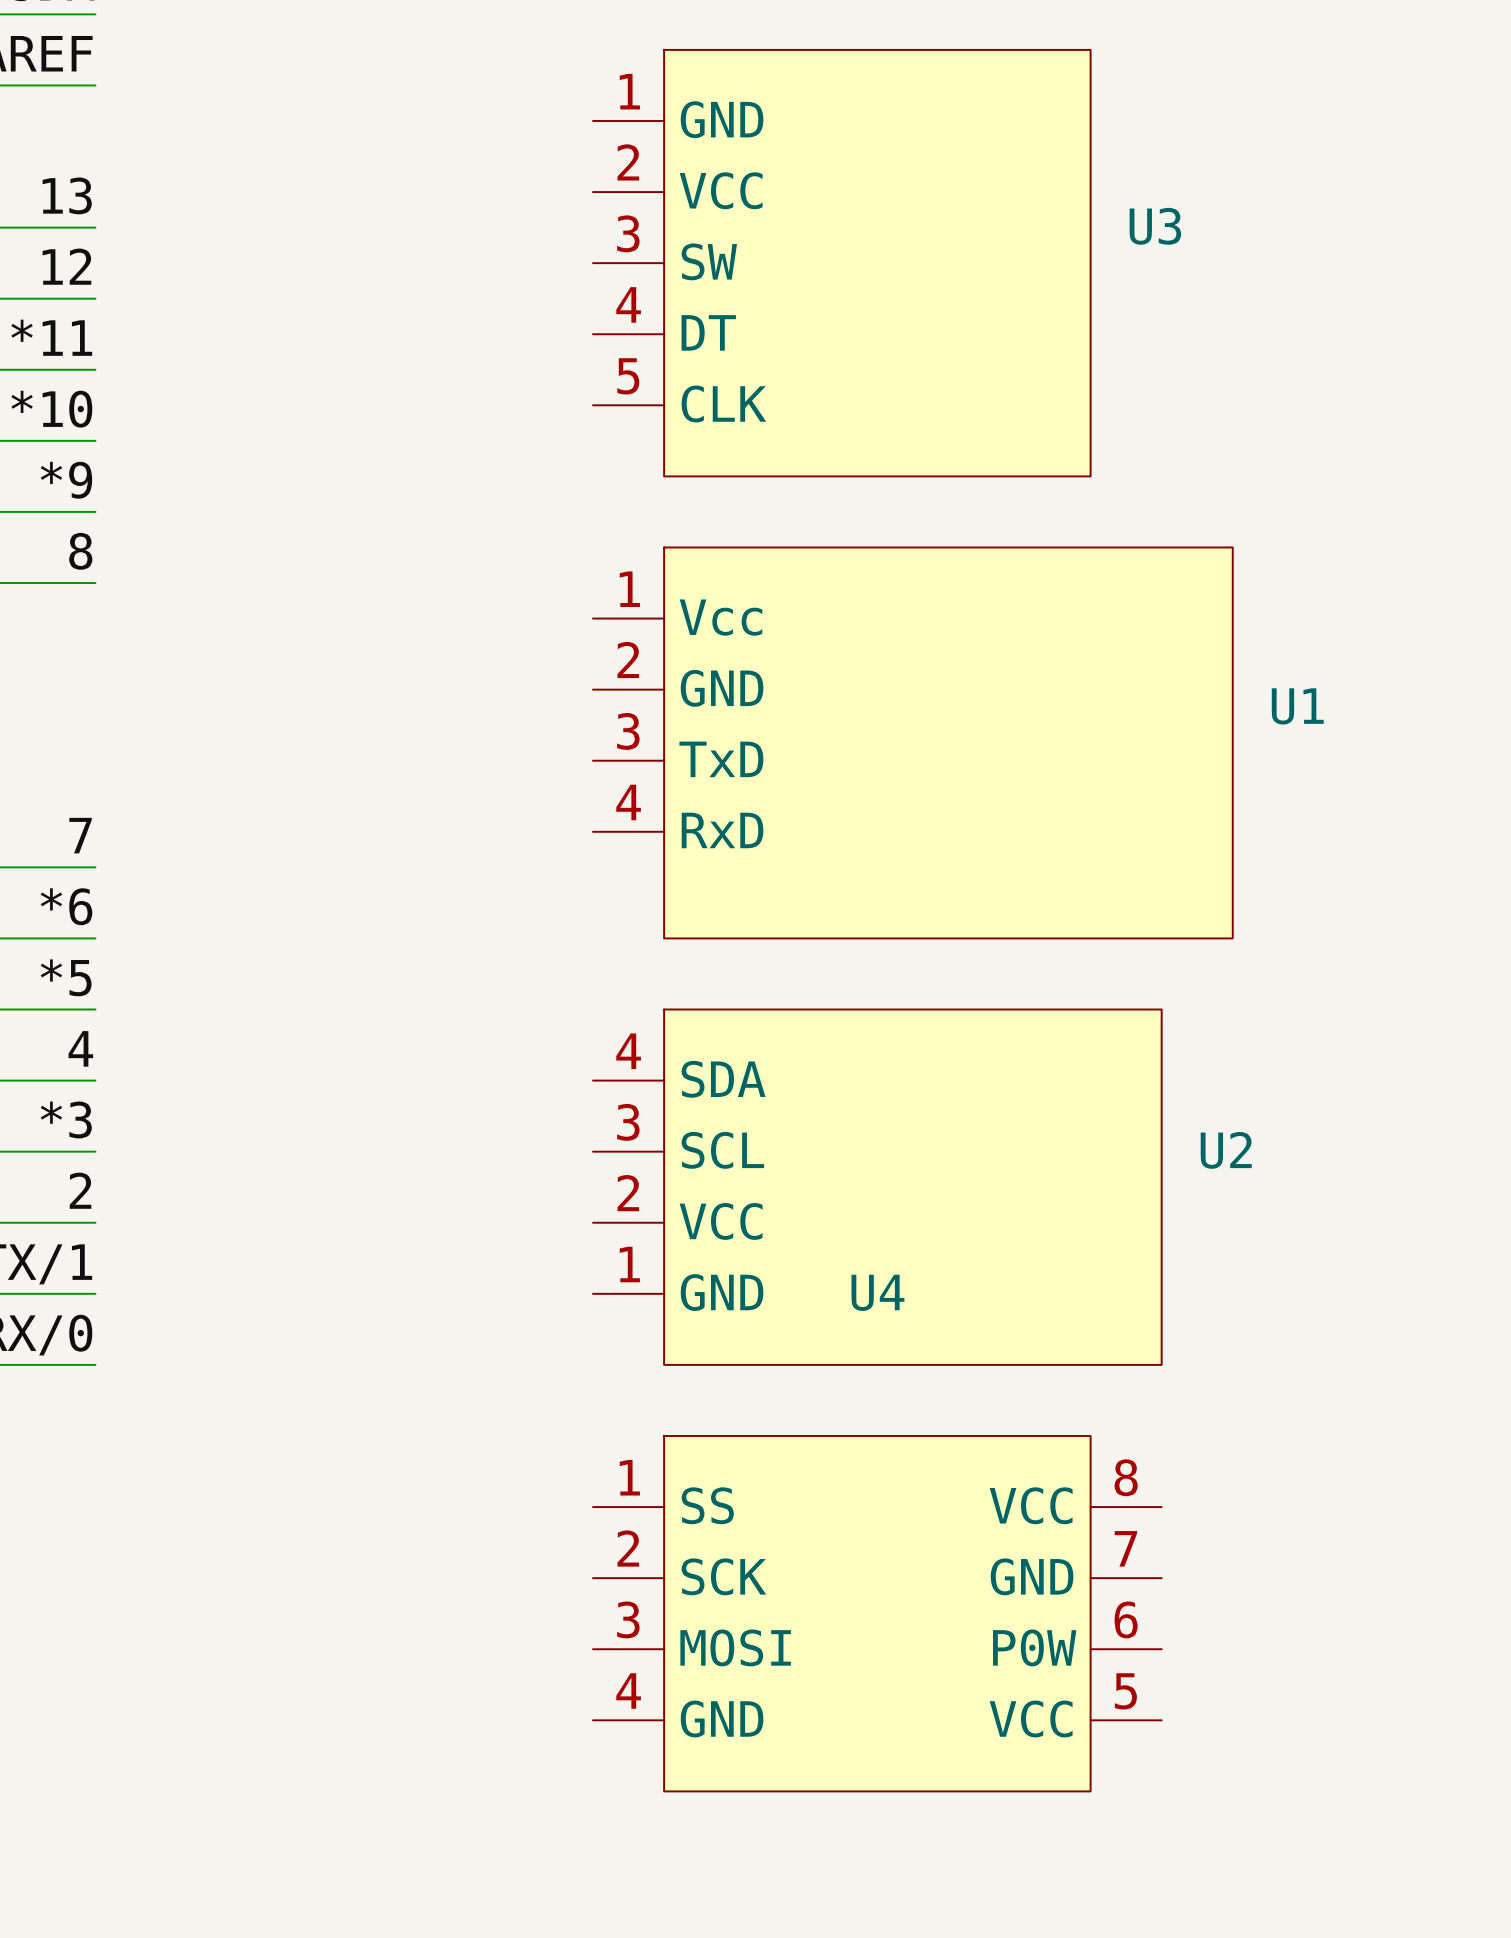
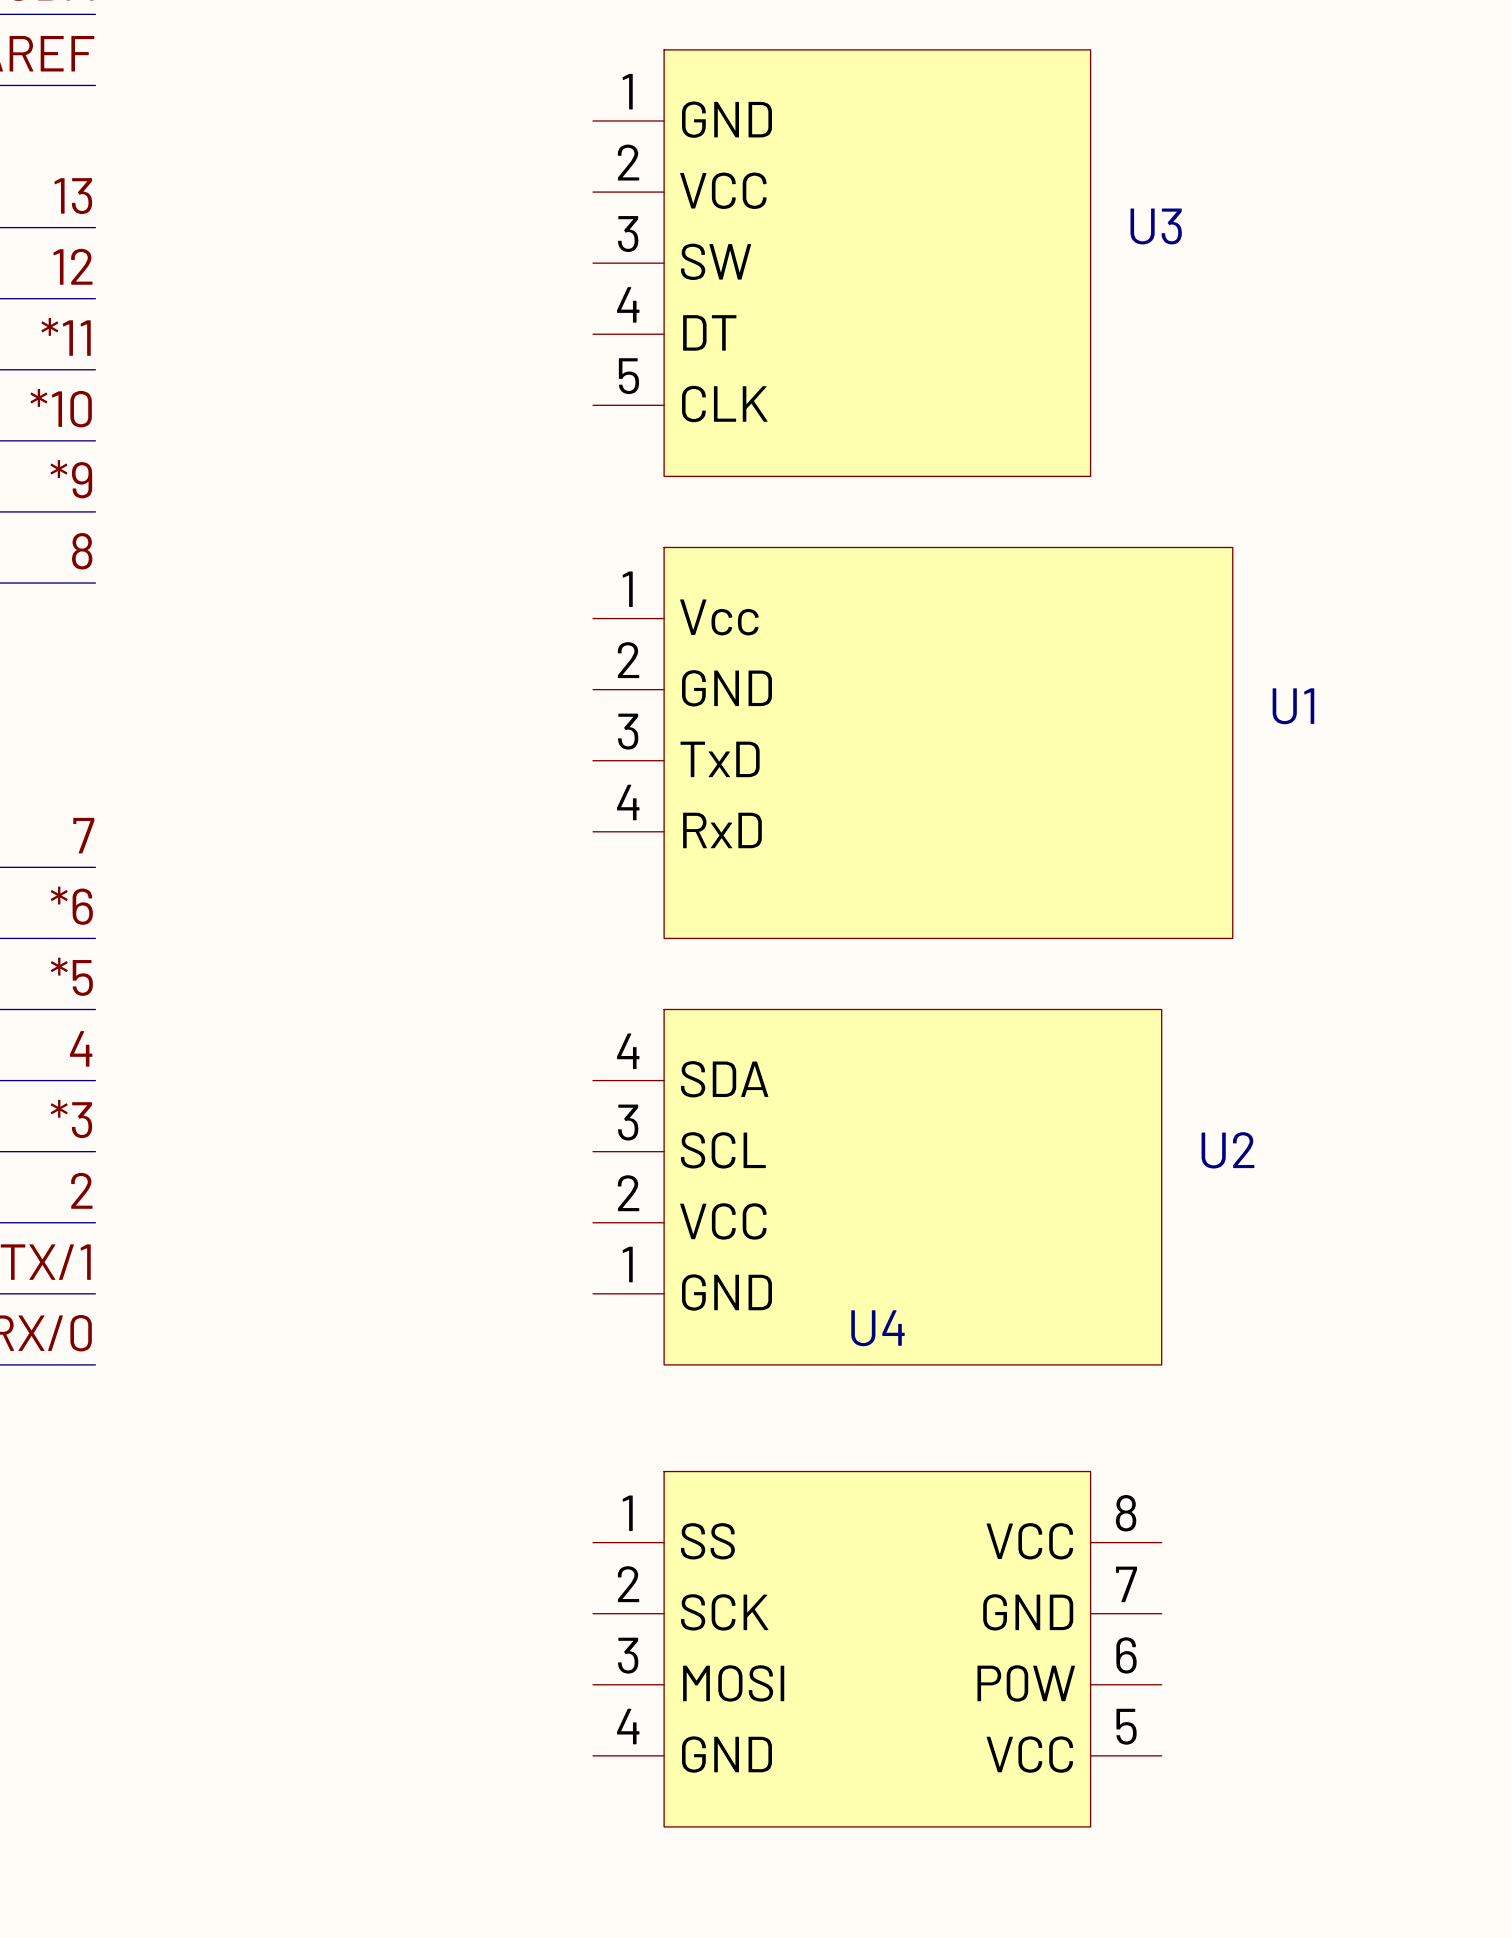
U4 position: (877, 1613) -> (877, 1649)

